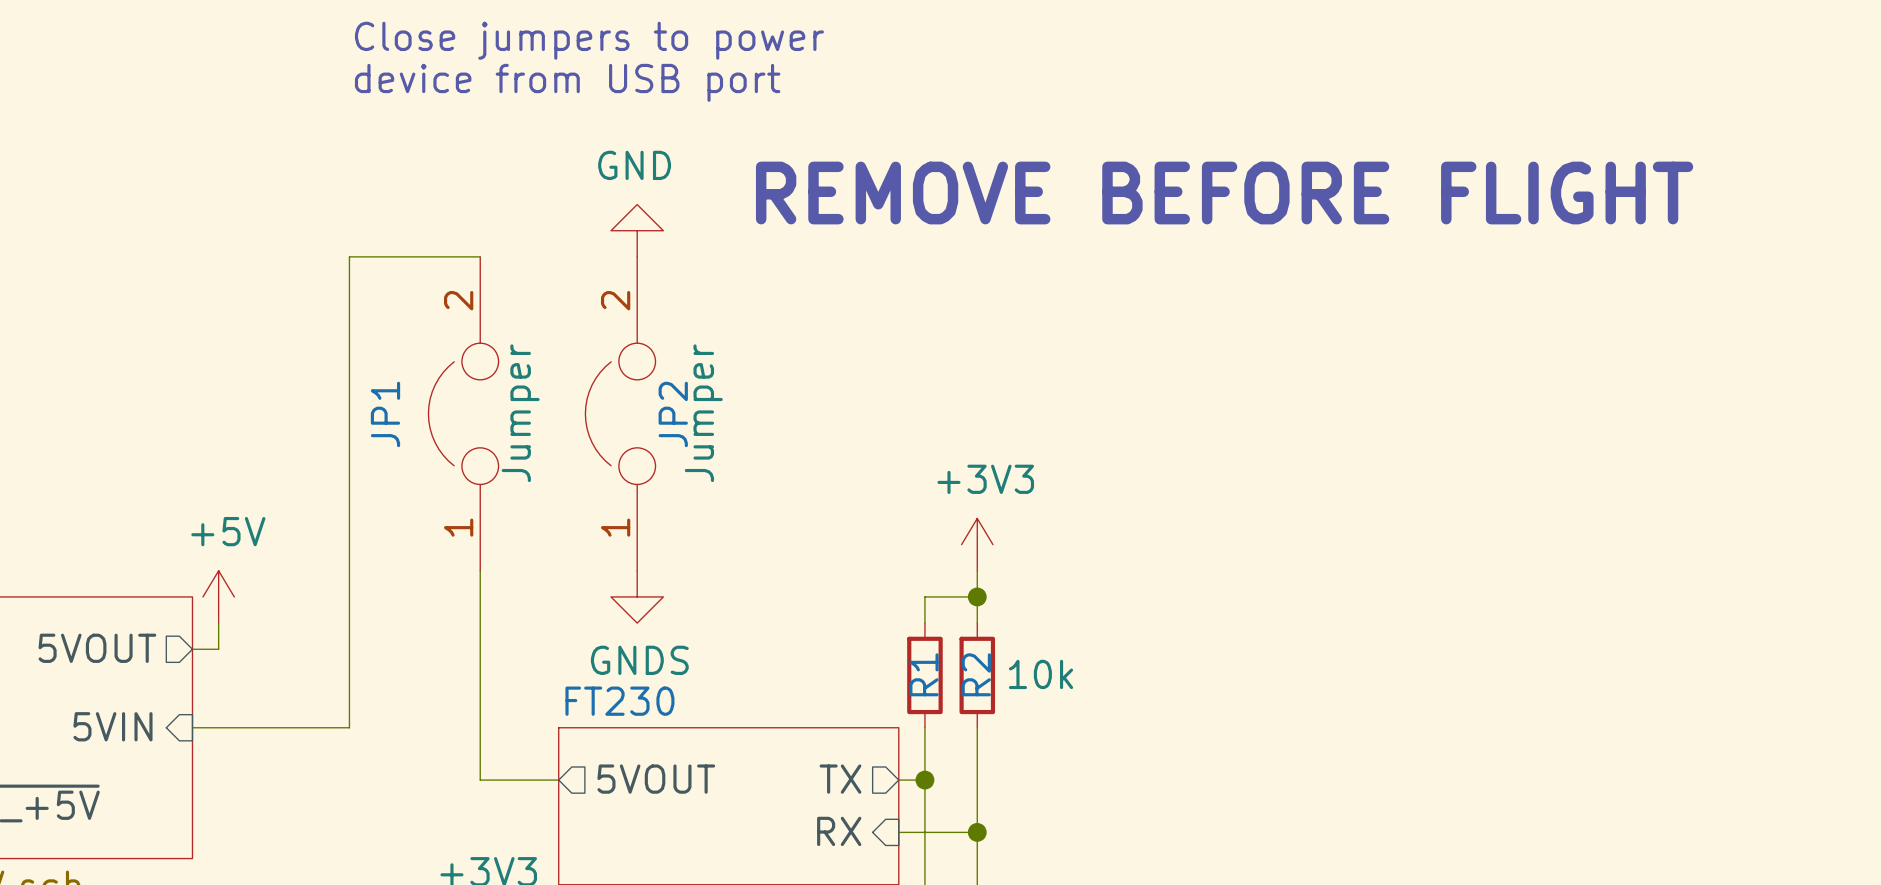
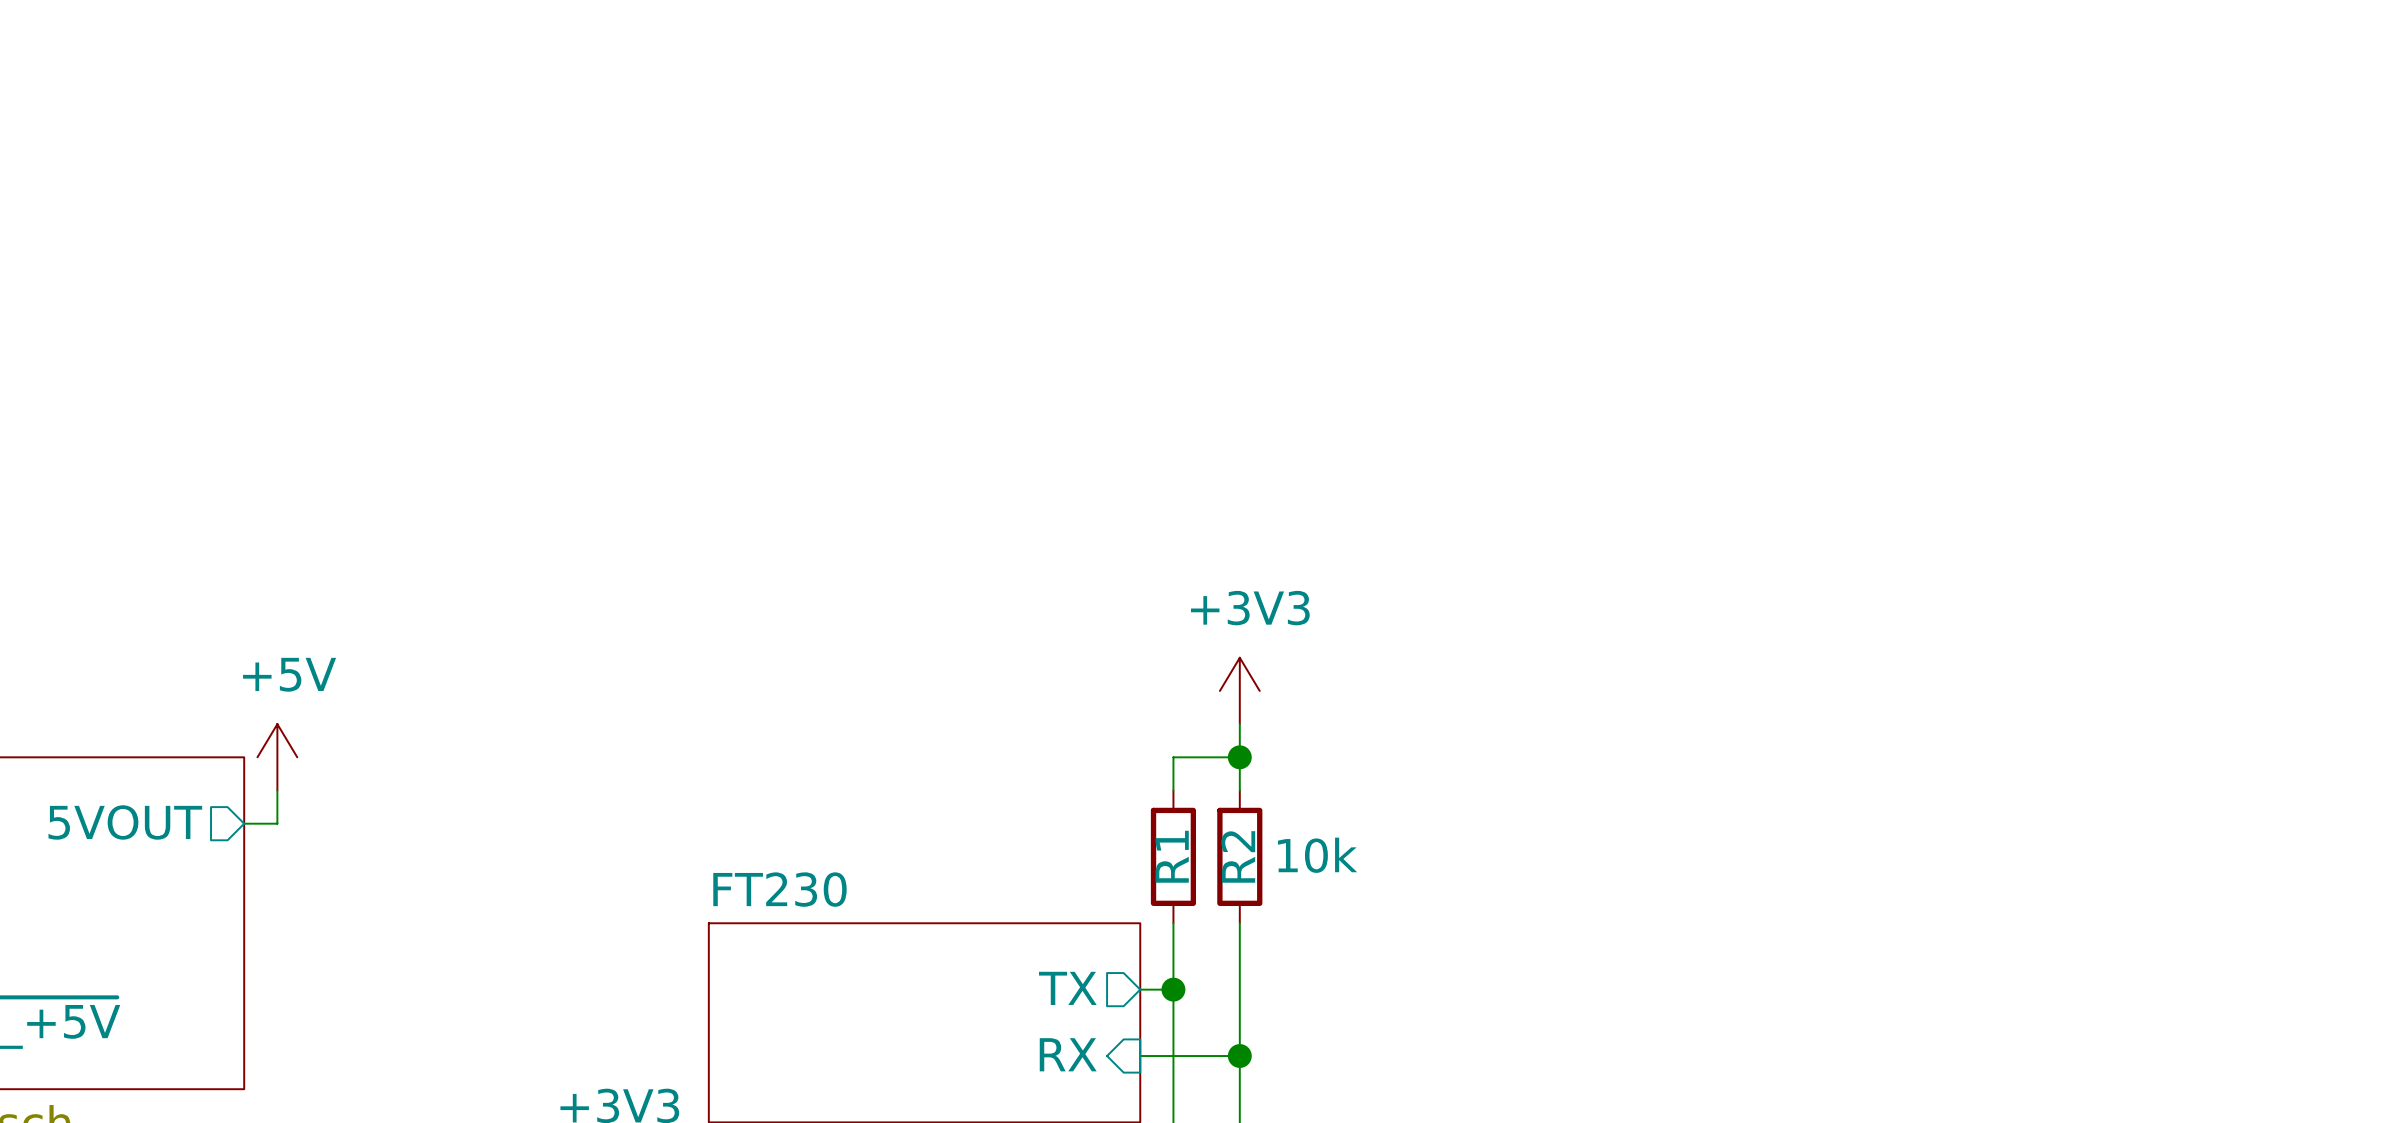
text: Close jumpers to power (589, 40) -> none
text: device from USB port (567, 82) -> none
text: REMOVE BEFORE FLIGHT (1224, 193) -> none
power symbol: GND (637, 230) -> none
wire: (480, 256) (349, 256) (349, 727) (192, 727) -> none
JP1: Jumper (463, 413) -> none
JP2: Jumper (620, 413) -> none
wire: (480, 570) (480, 780) (558, 780) -> none
power symbol: GNDS (637, 596) -> none
sheet pin: 5VIN (112, 726) -> none
sheet pin: 5VOUT (656, 779) -> none

